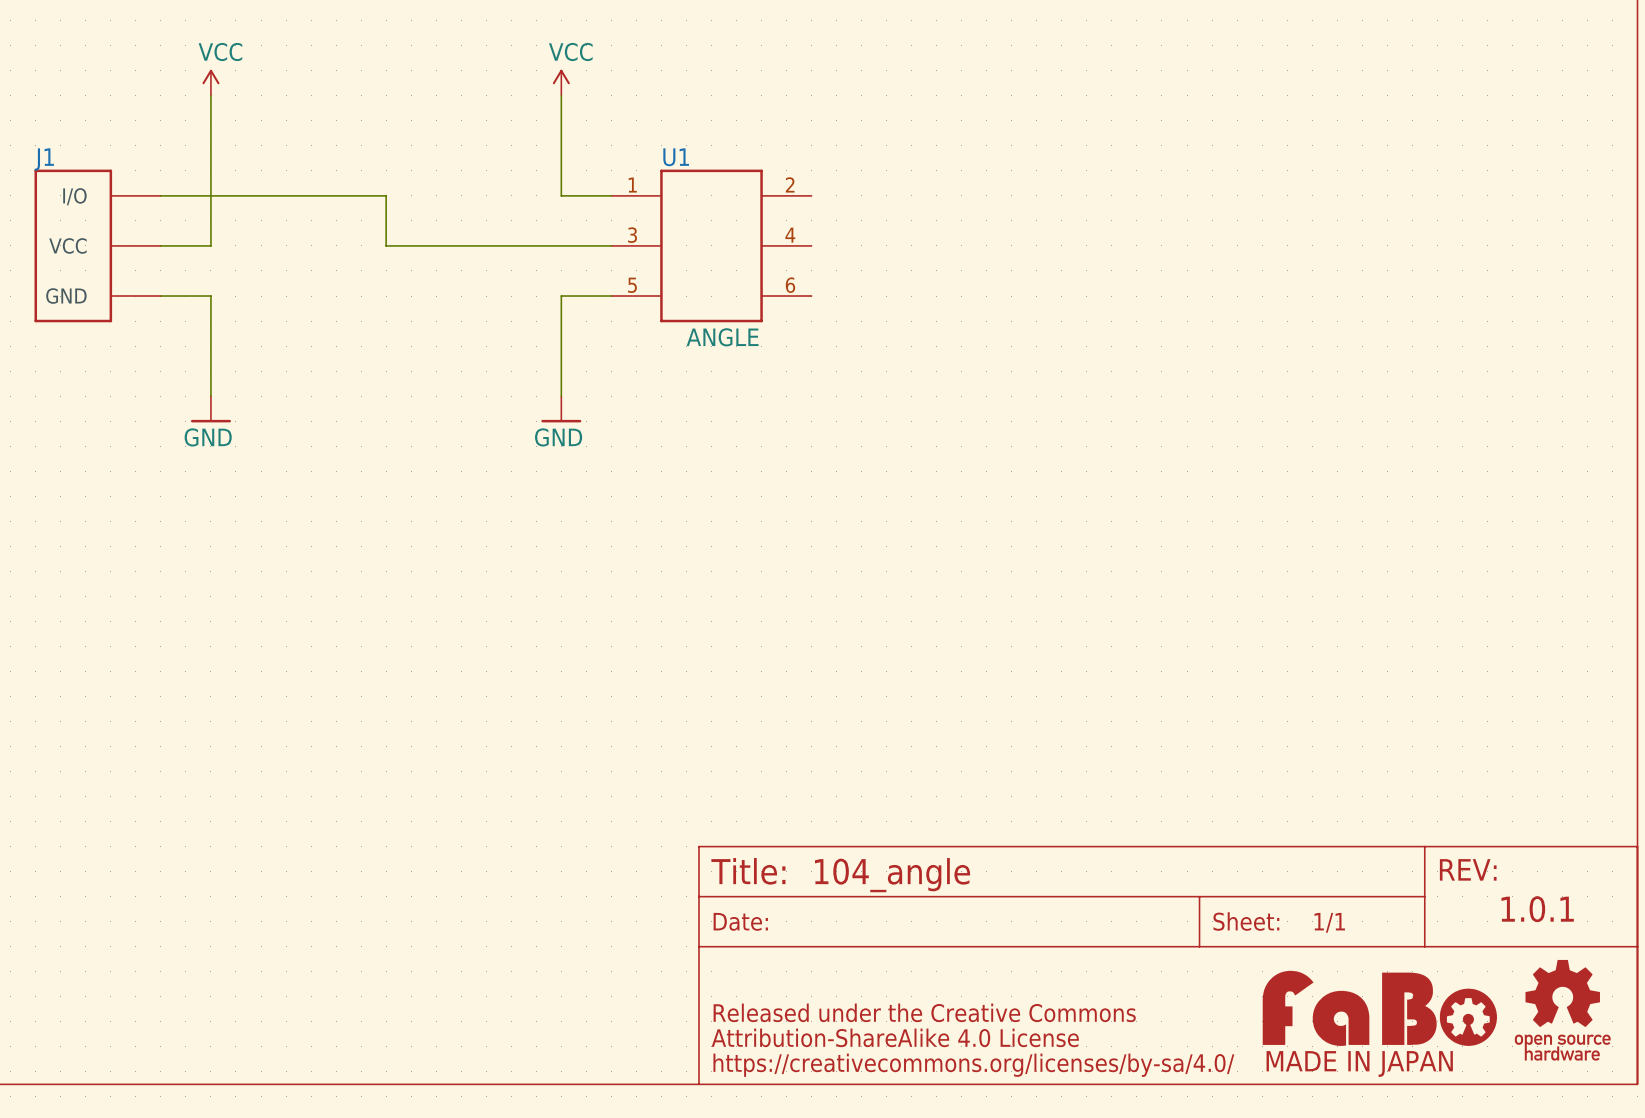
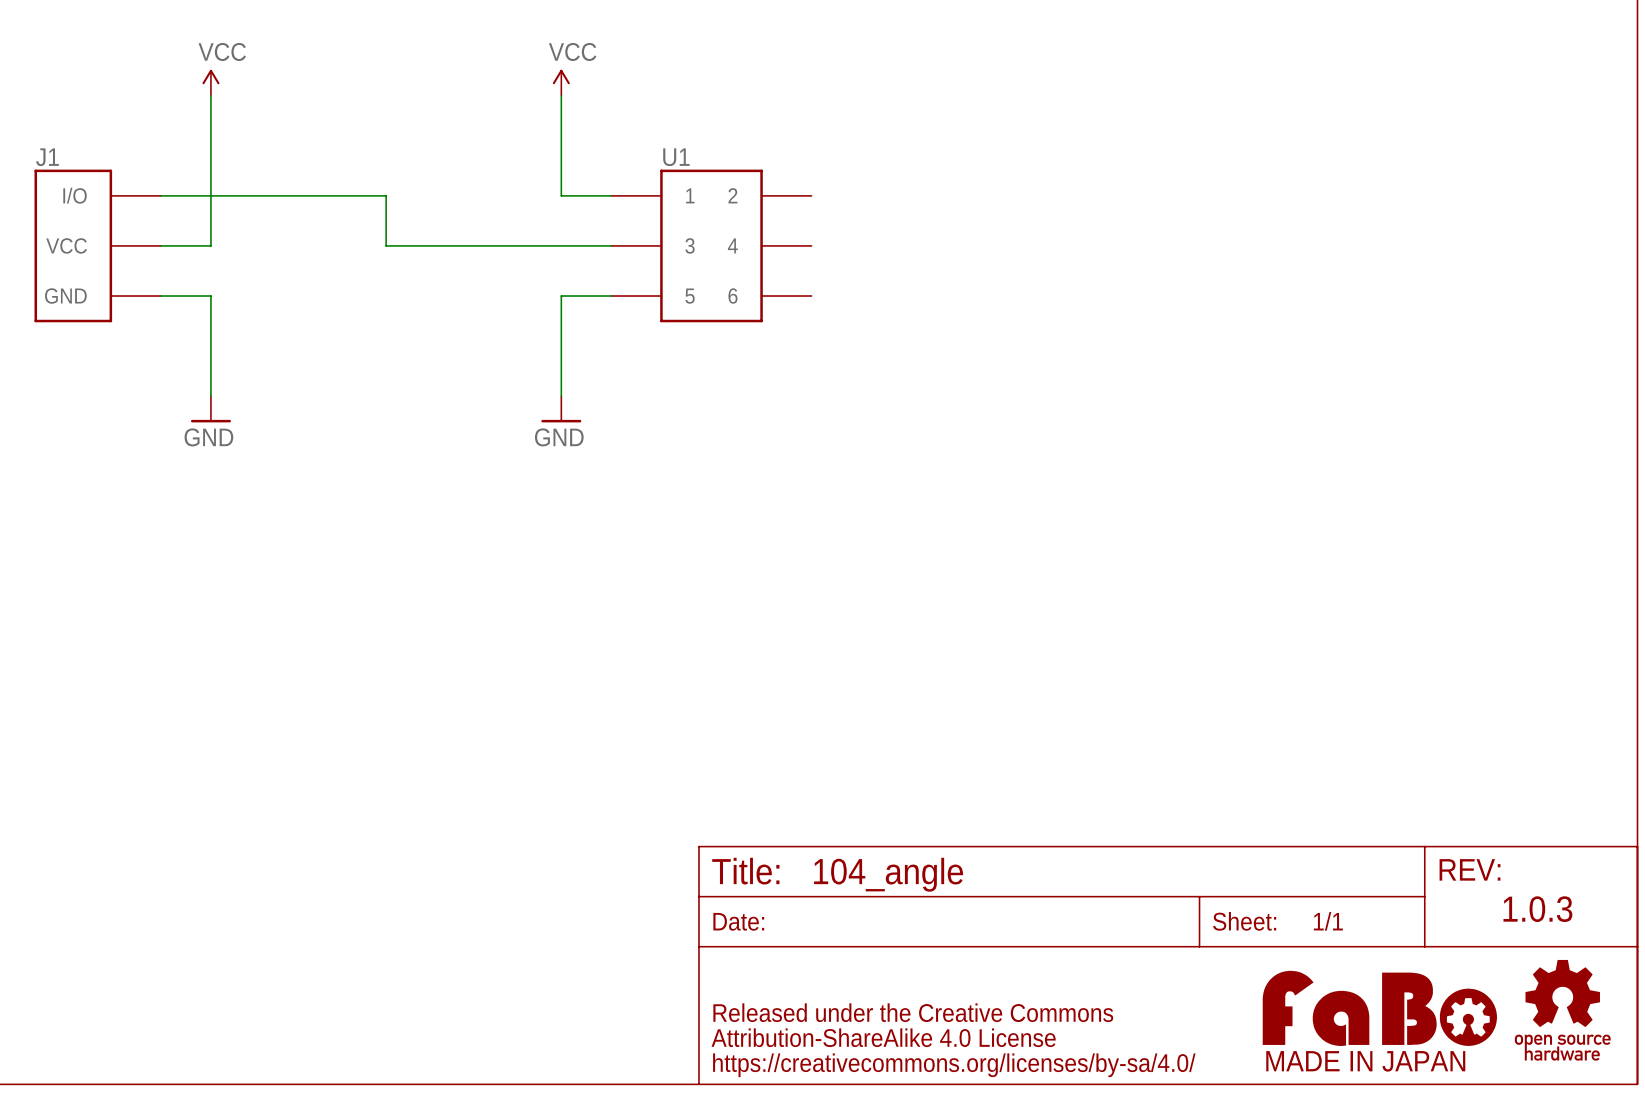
U1 symbol: [611, 169, 812, 323] -> [611, 169, 812, 323]
U1 value: ANGLE (722, 337) -> none
text: 1.0.1 (1537, 909) -> 1.0.3 (1537, 909)

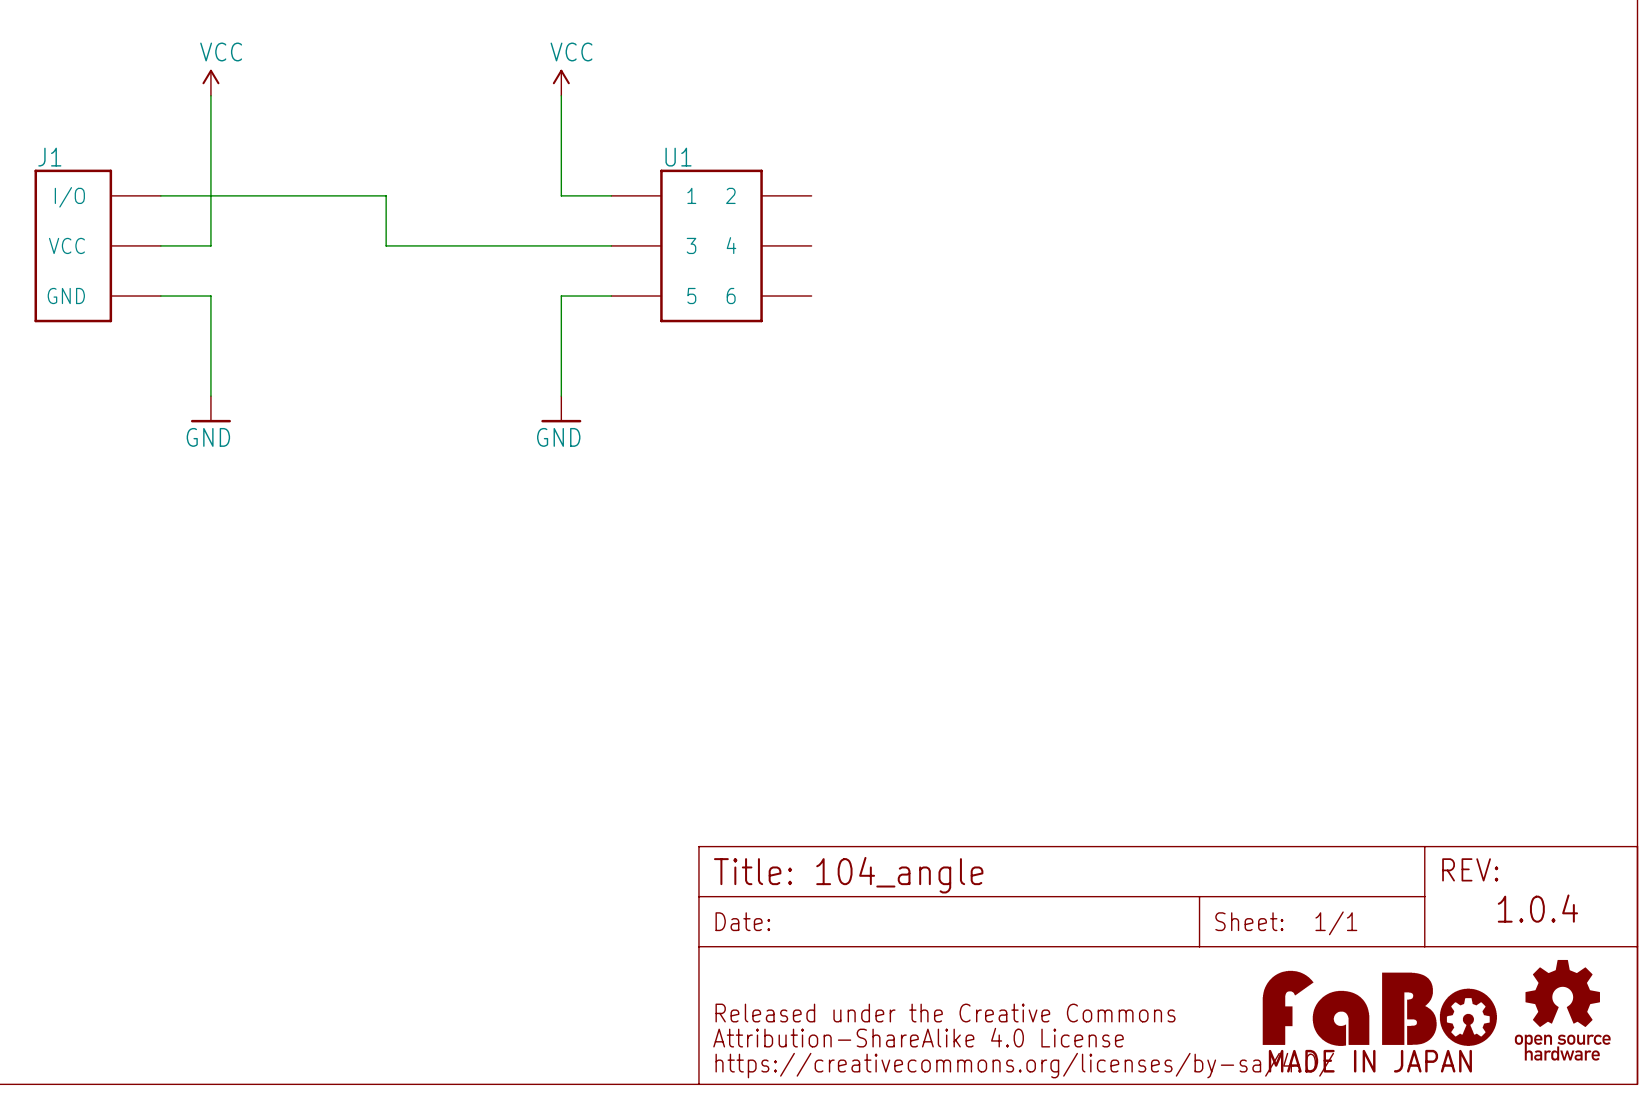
text: 1.0.3 (1537, 909) -> 1.0.4 (1537, 908)

